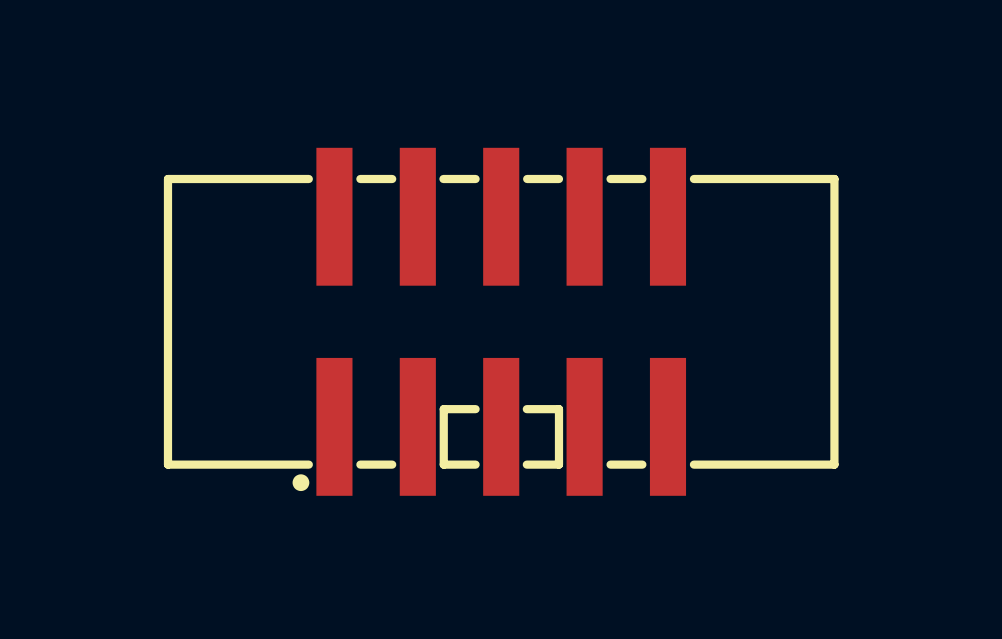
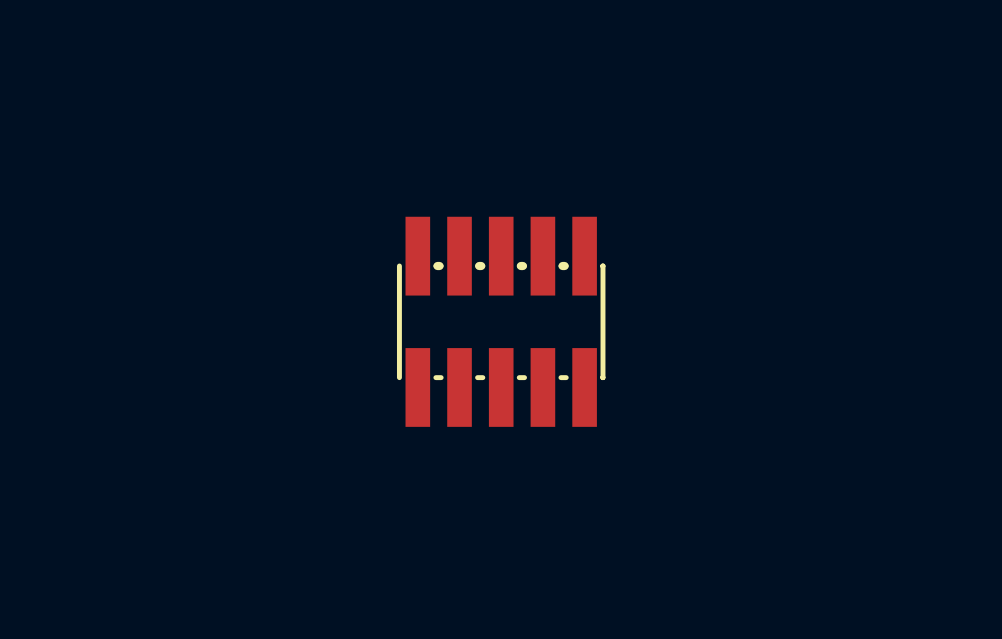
part footprint: [163, 147, 839, 496] -> [396, 216, 606, 427]

